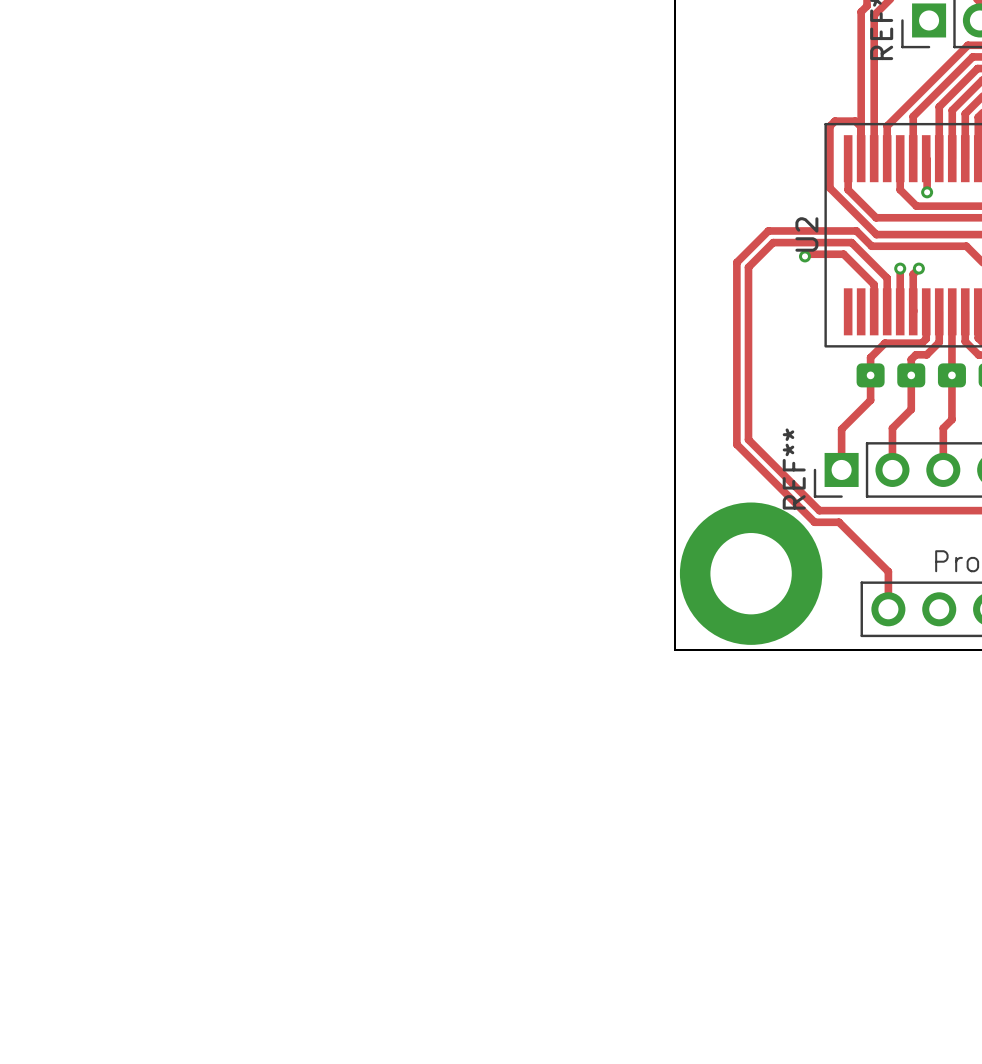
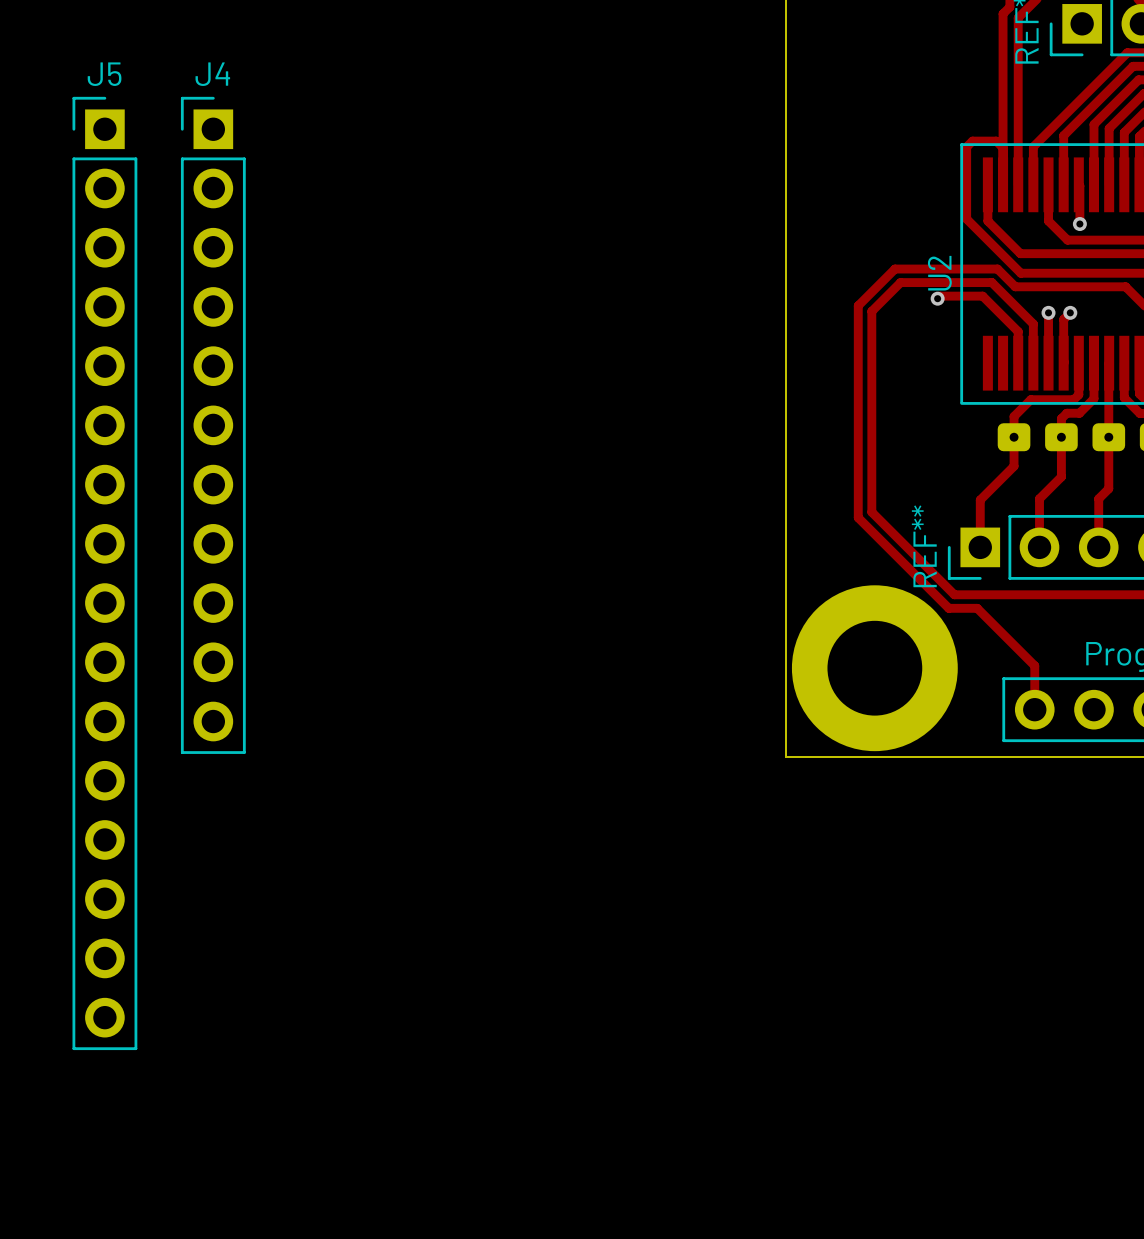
J4: none -> (213, 425)
J5: none -> (104, 573)

